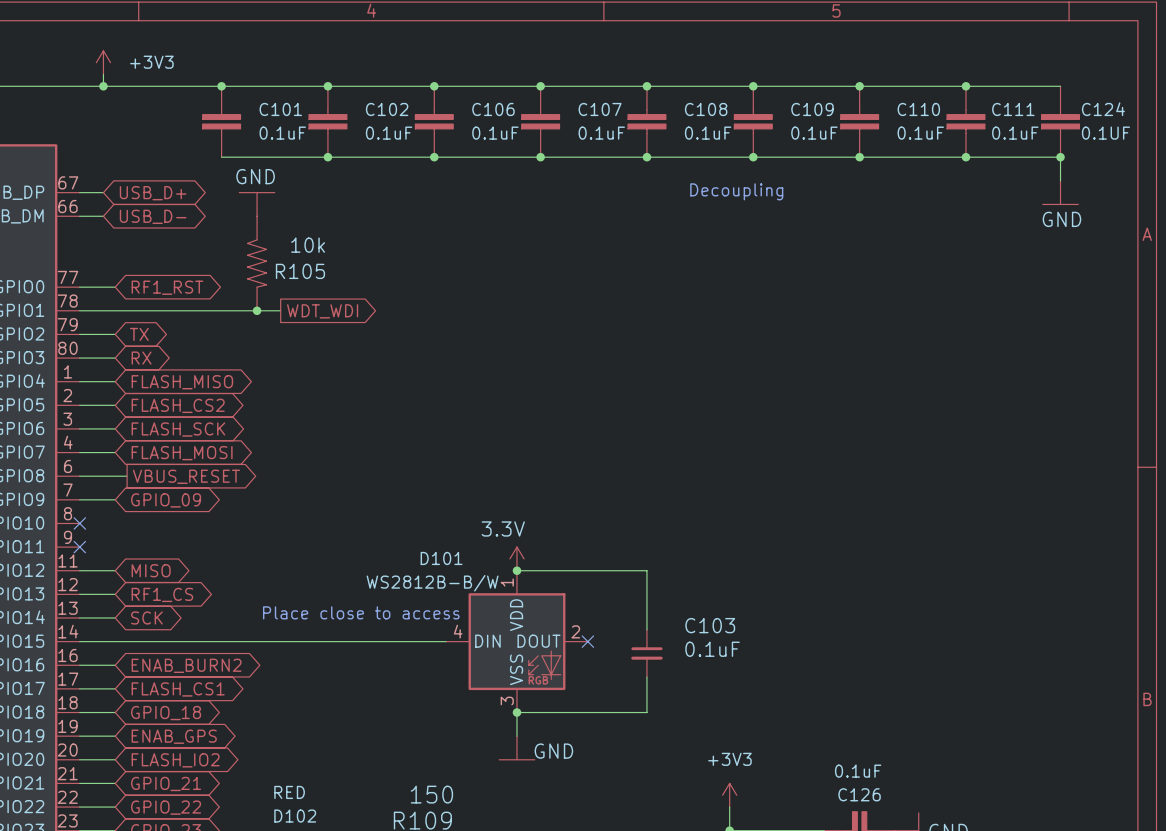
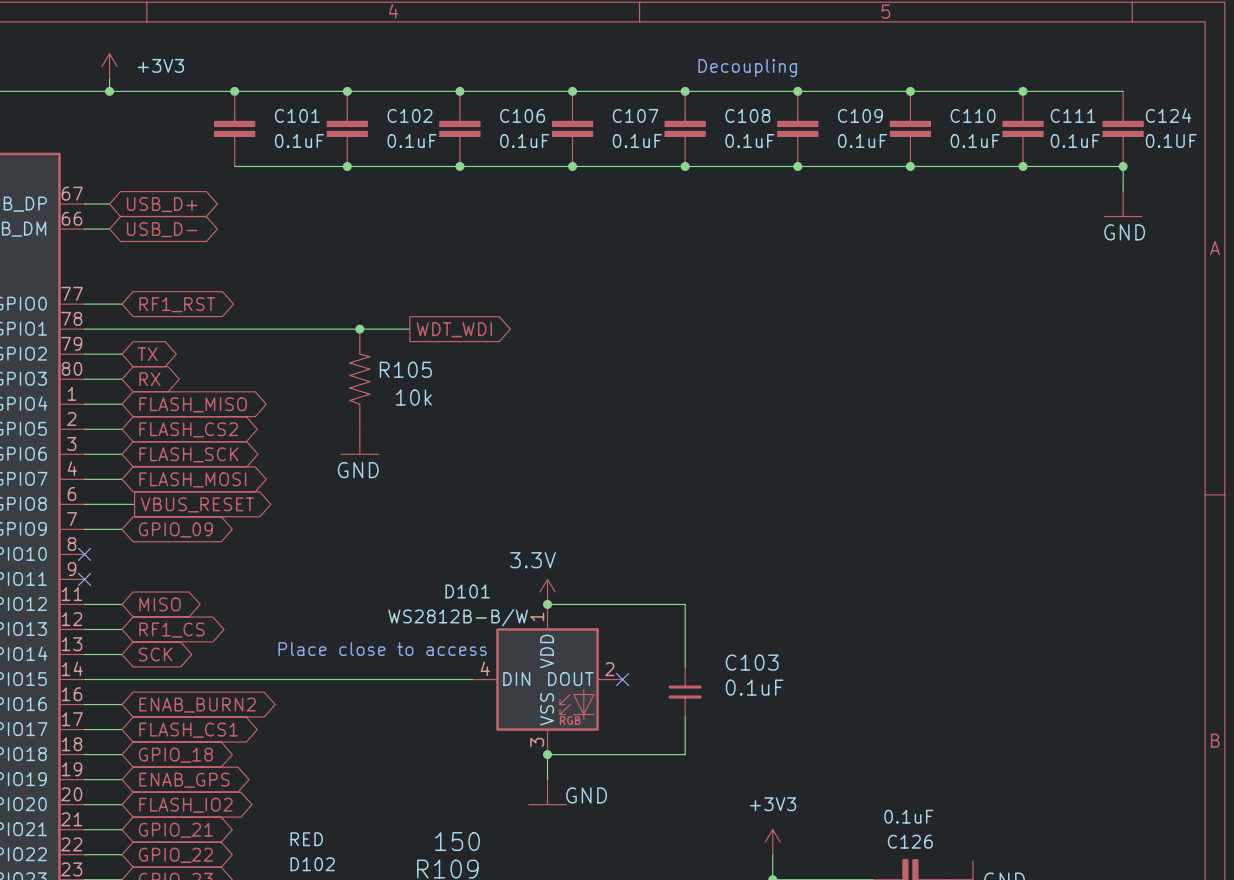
text position: Decoupling (736, 191) -> Decoupling (747, 68)
power symbol rotation: 0° (257, 192) -> 180° (359, 454)
power symbol position: GND (257, 204) -> GND (359, 441)
R105 flip: as is (257, 263) -> up-down (359, 379)
R105 position: (257, 263) -> (359, 379)
junction: (257, 310) -> none
wire: none -> (297, 329) (409, 329)
junction: none -> (359, 329)
global label position: WDT_WDI (322, 311) -> WDT_WDI (454, 329)

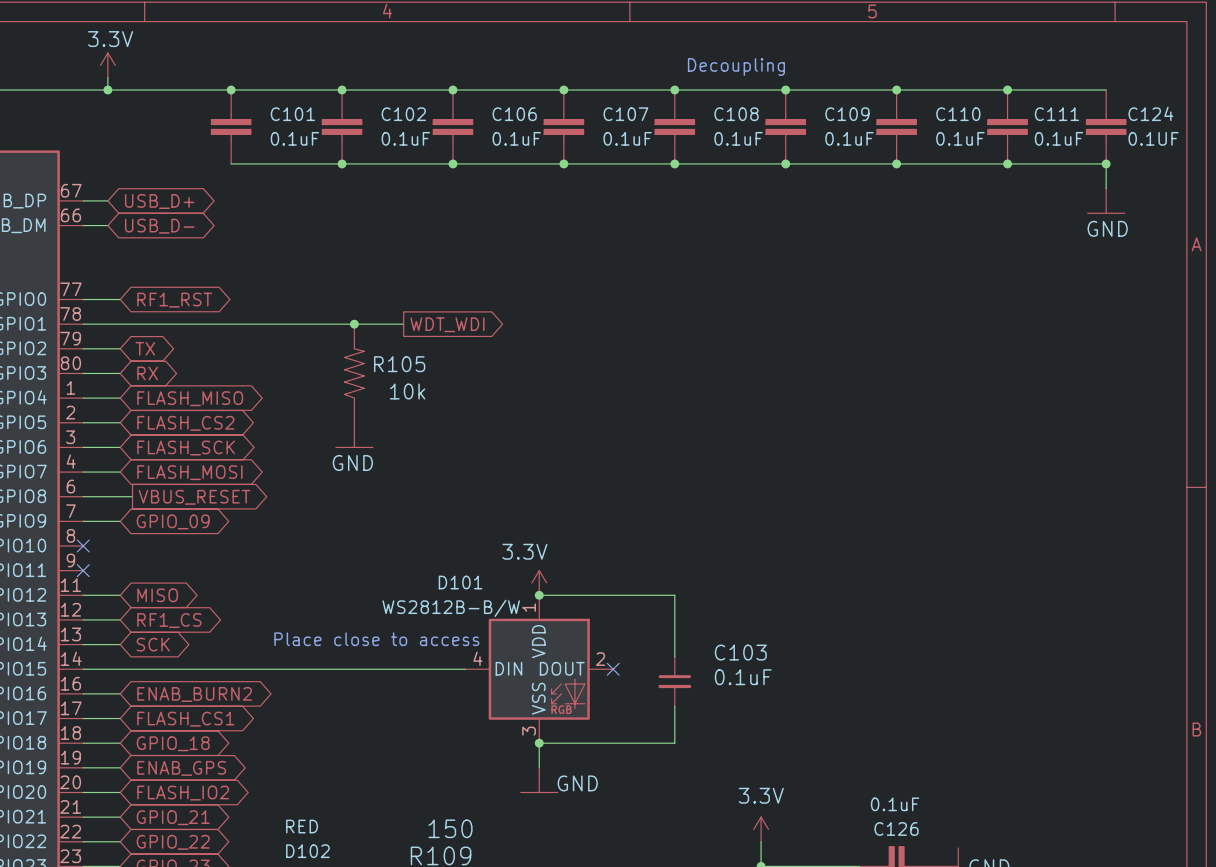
power symbol: +3V3 (109, 66) -> 3.3V (107, 65)
power symbol: +3V3 (772, 842) -> 3.3V (761, 829)

